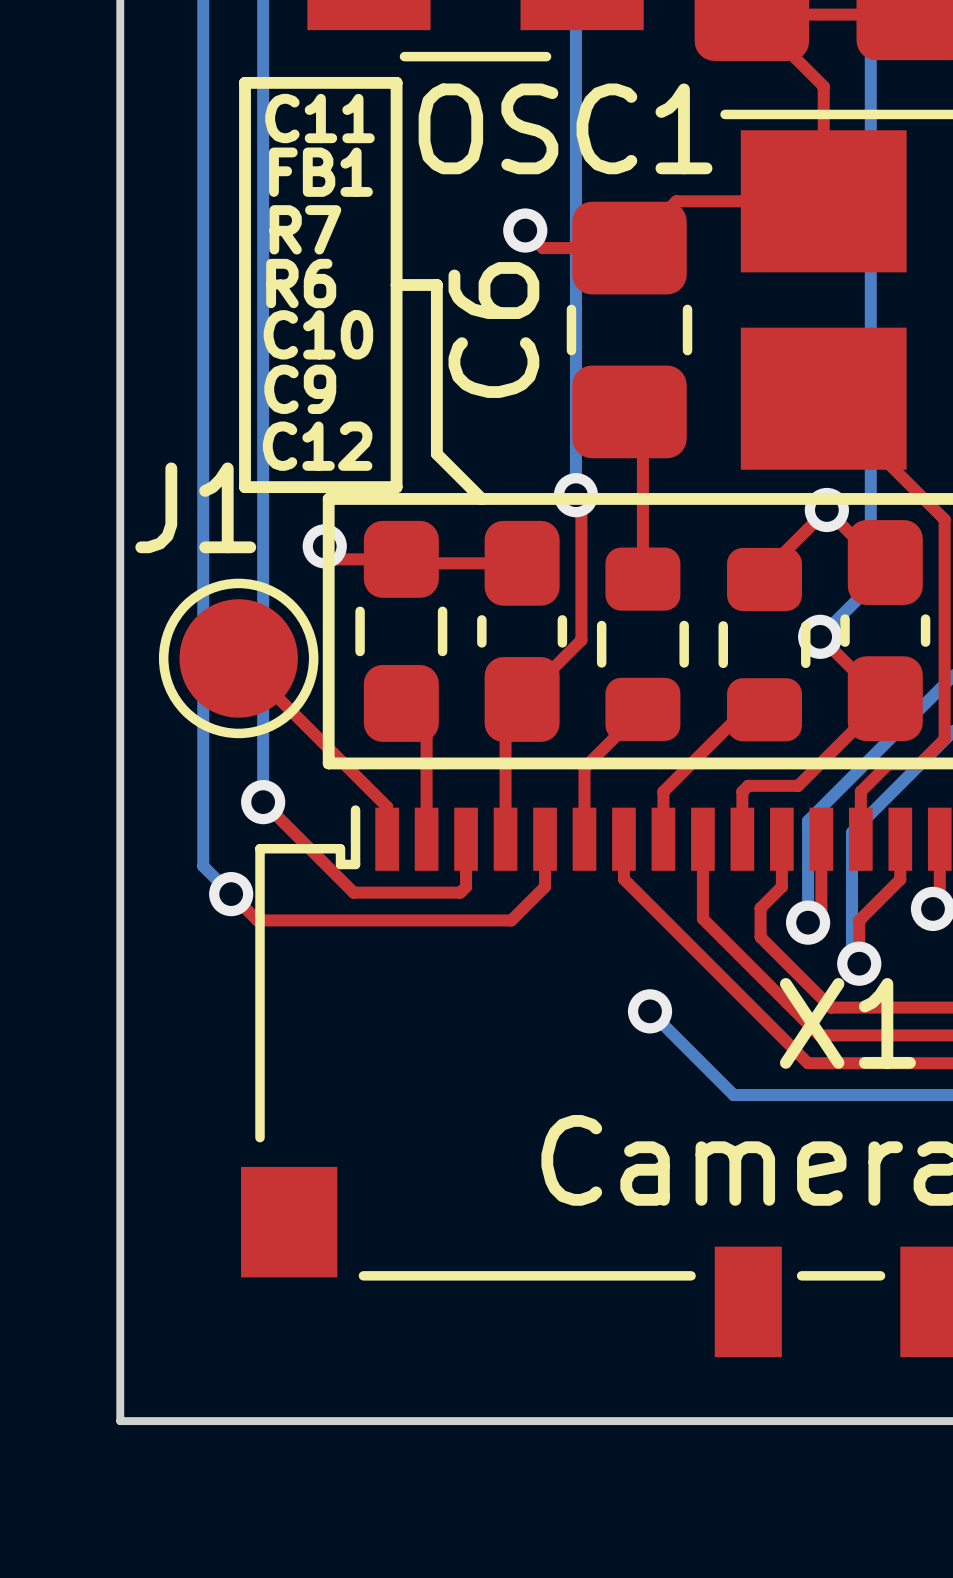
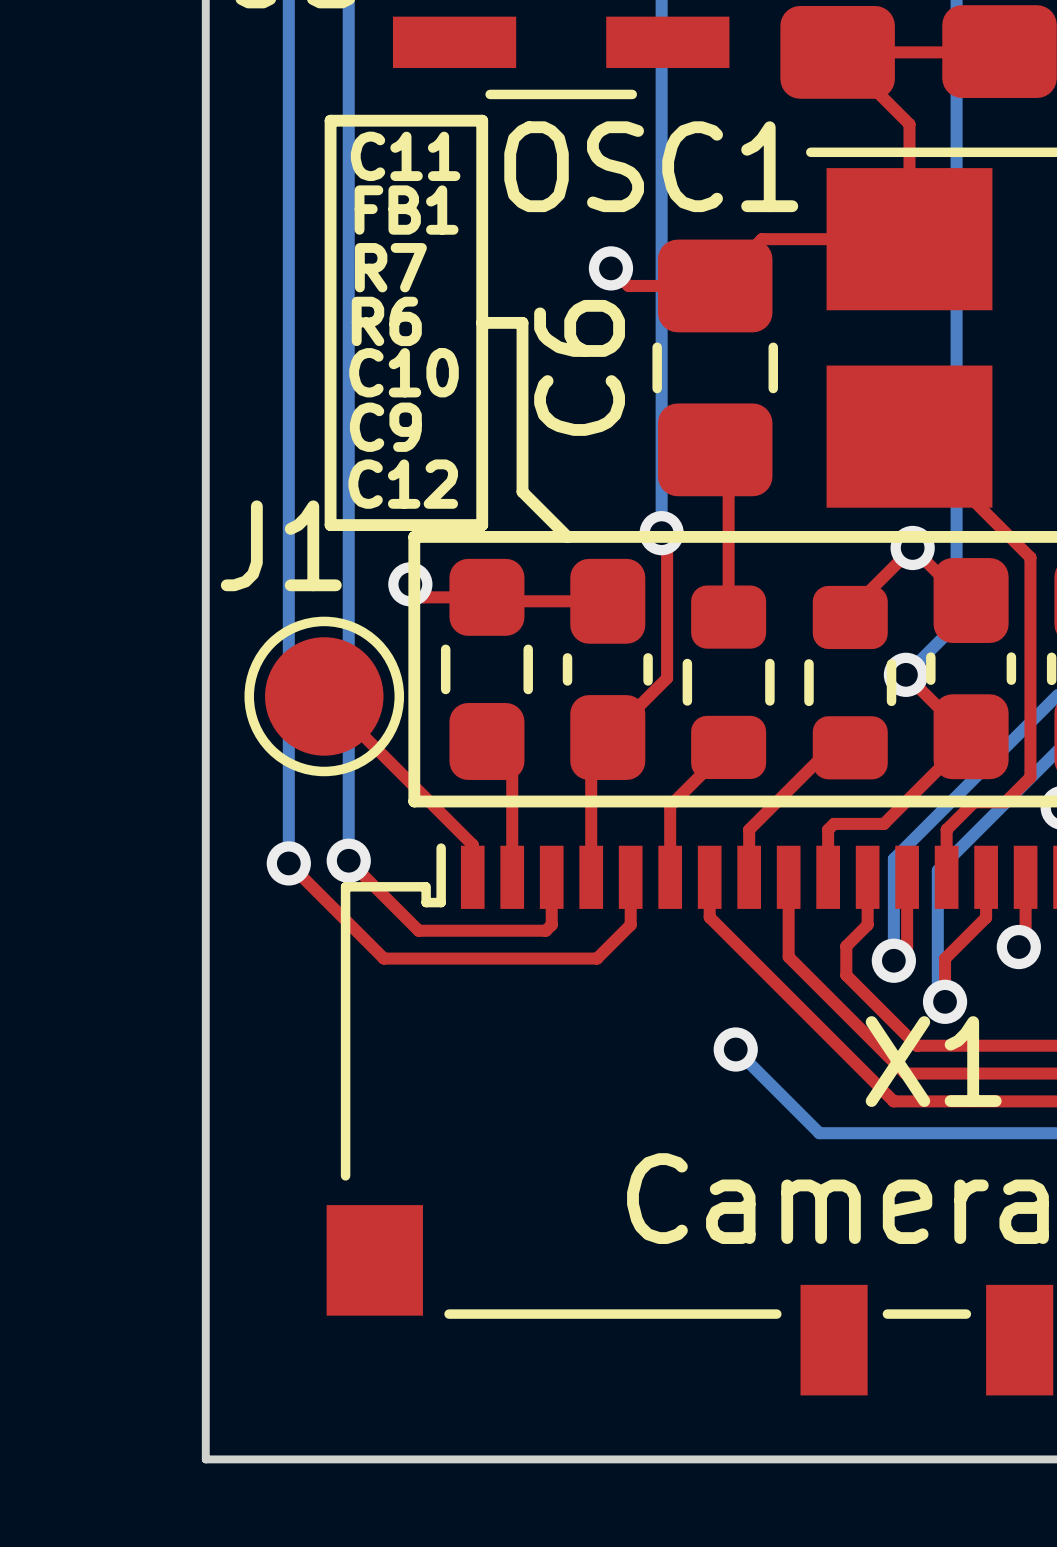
top track: (263, 802) (353, 892) -> (348, 860) (418, 930) (439, 930)
via position: (263, 802) -> (348, 860)
bottom track: (203, 825) (203, 866) (231, 894) -> none
via: none -> (288, 863)
top track: (231, 894) (257, 920) (298, 920) -> (288, 863) (383, 958)
via: (231, 894) -> none

